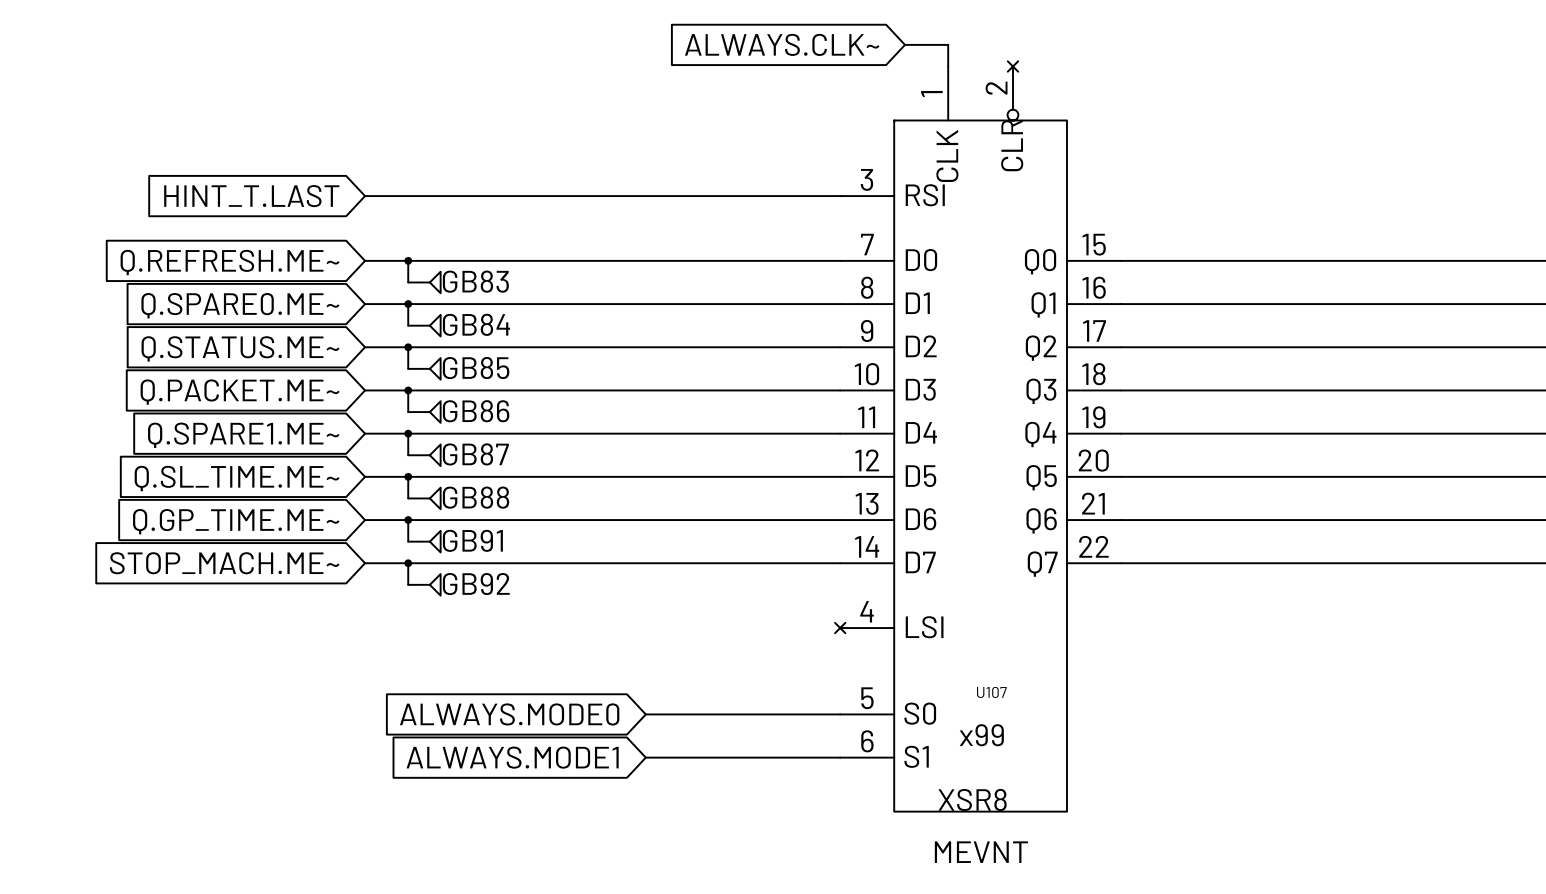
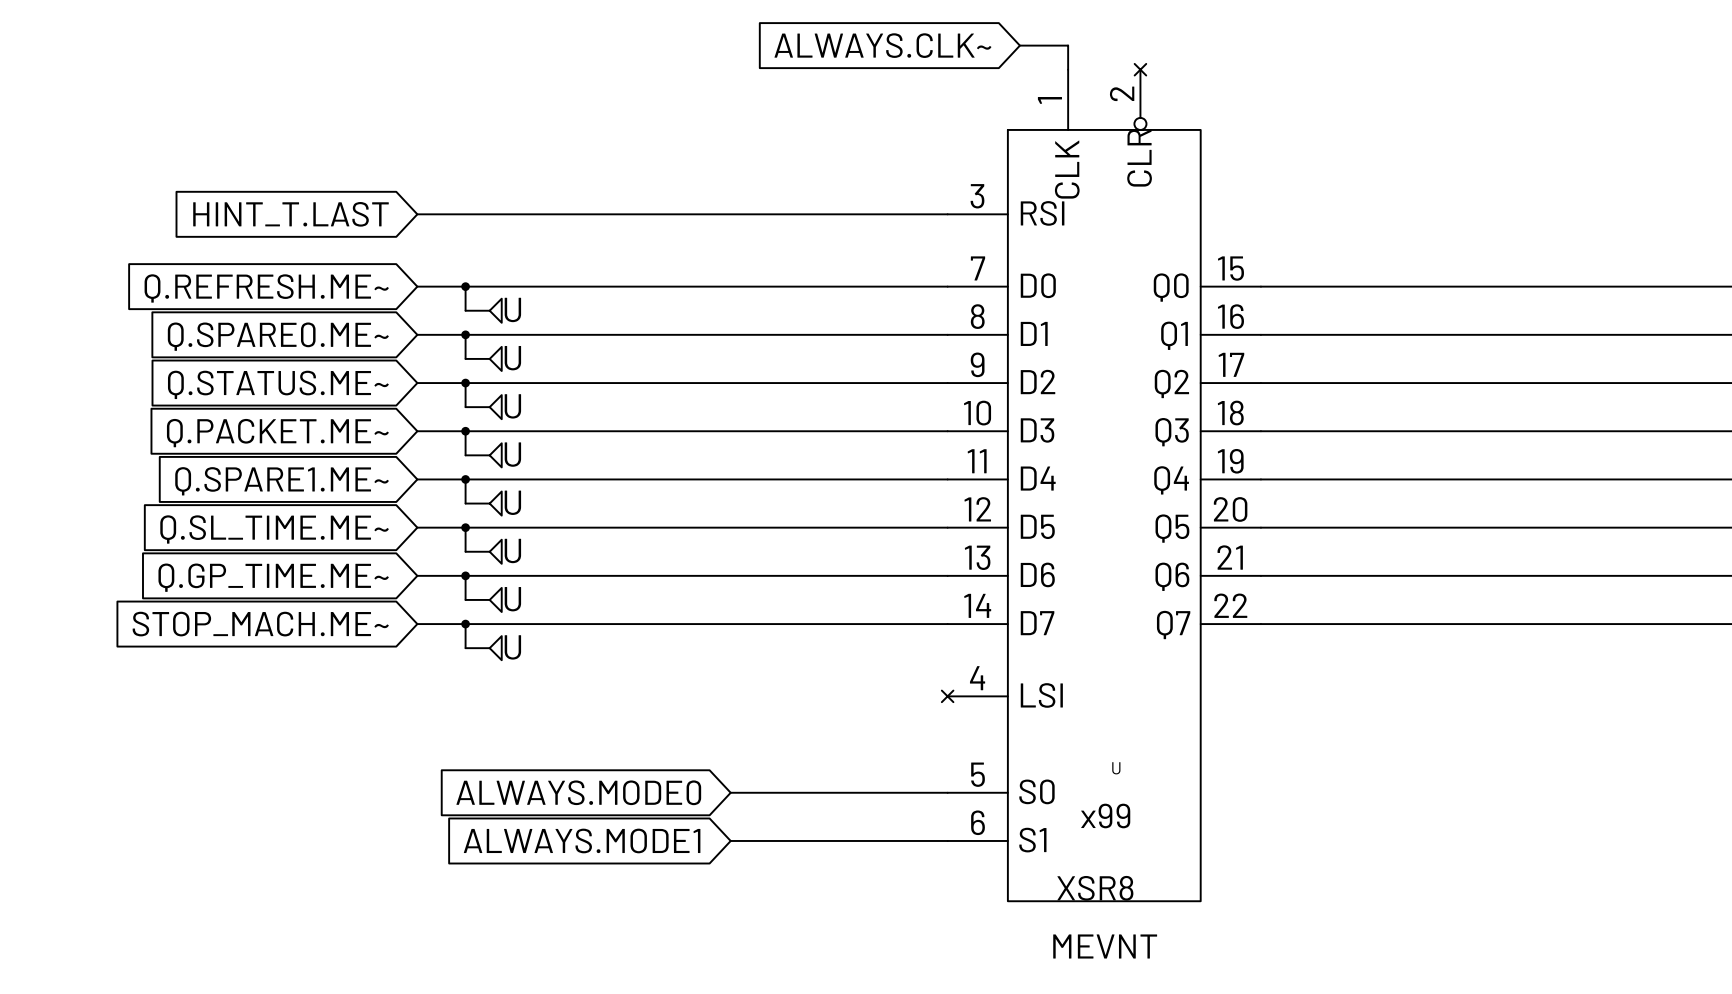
GB83 name: GB83 (475, 281) -> U (512, 309)
GB84 name: GB84 (476, 324) -> U (512, 358)
GB85 name: GB85 (476, 368) -> U (512, 406)
GB86 name: GB86 (476, 411) -> U (512, 454)
GB87 name: GB87 (475, 454) -> U (512, 502)
GB88 name: GB88 (476, 497) -> U (512, 550)
GB91 name: GB91 (472, 540) -> U (512, 599)
GB92 name: GB92 (476, 584) -> U (512, 647)
U107 name: U107 (991, 692) -> U (1116, 768)

